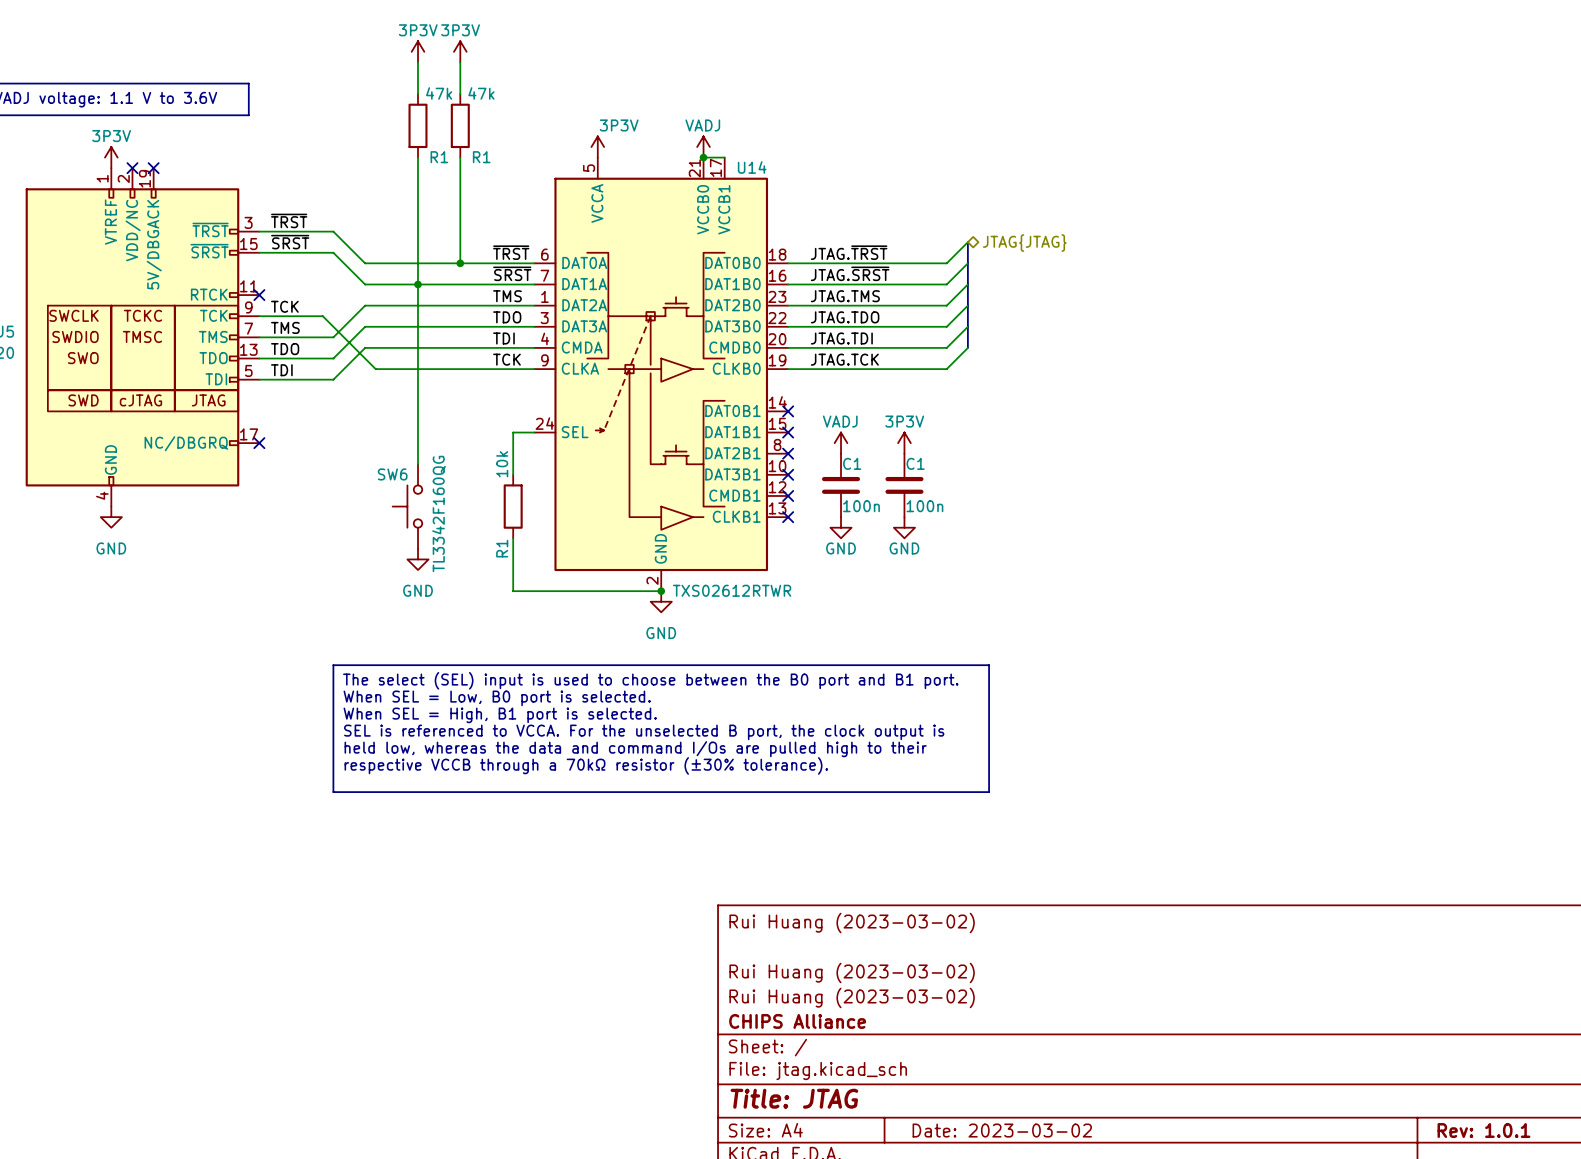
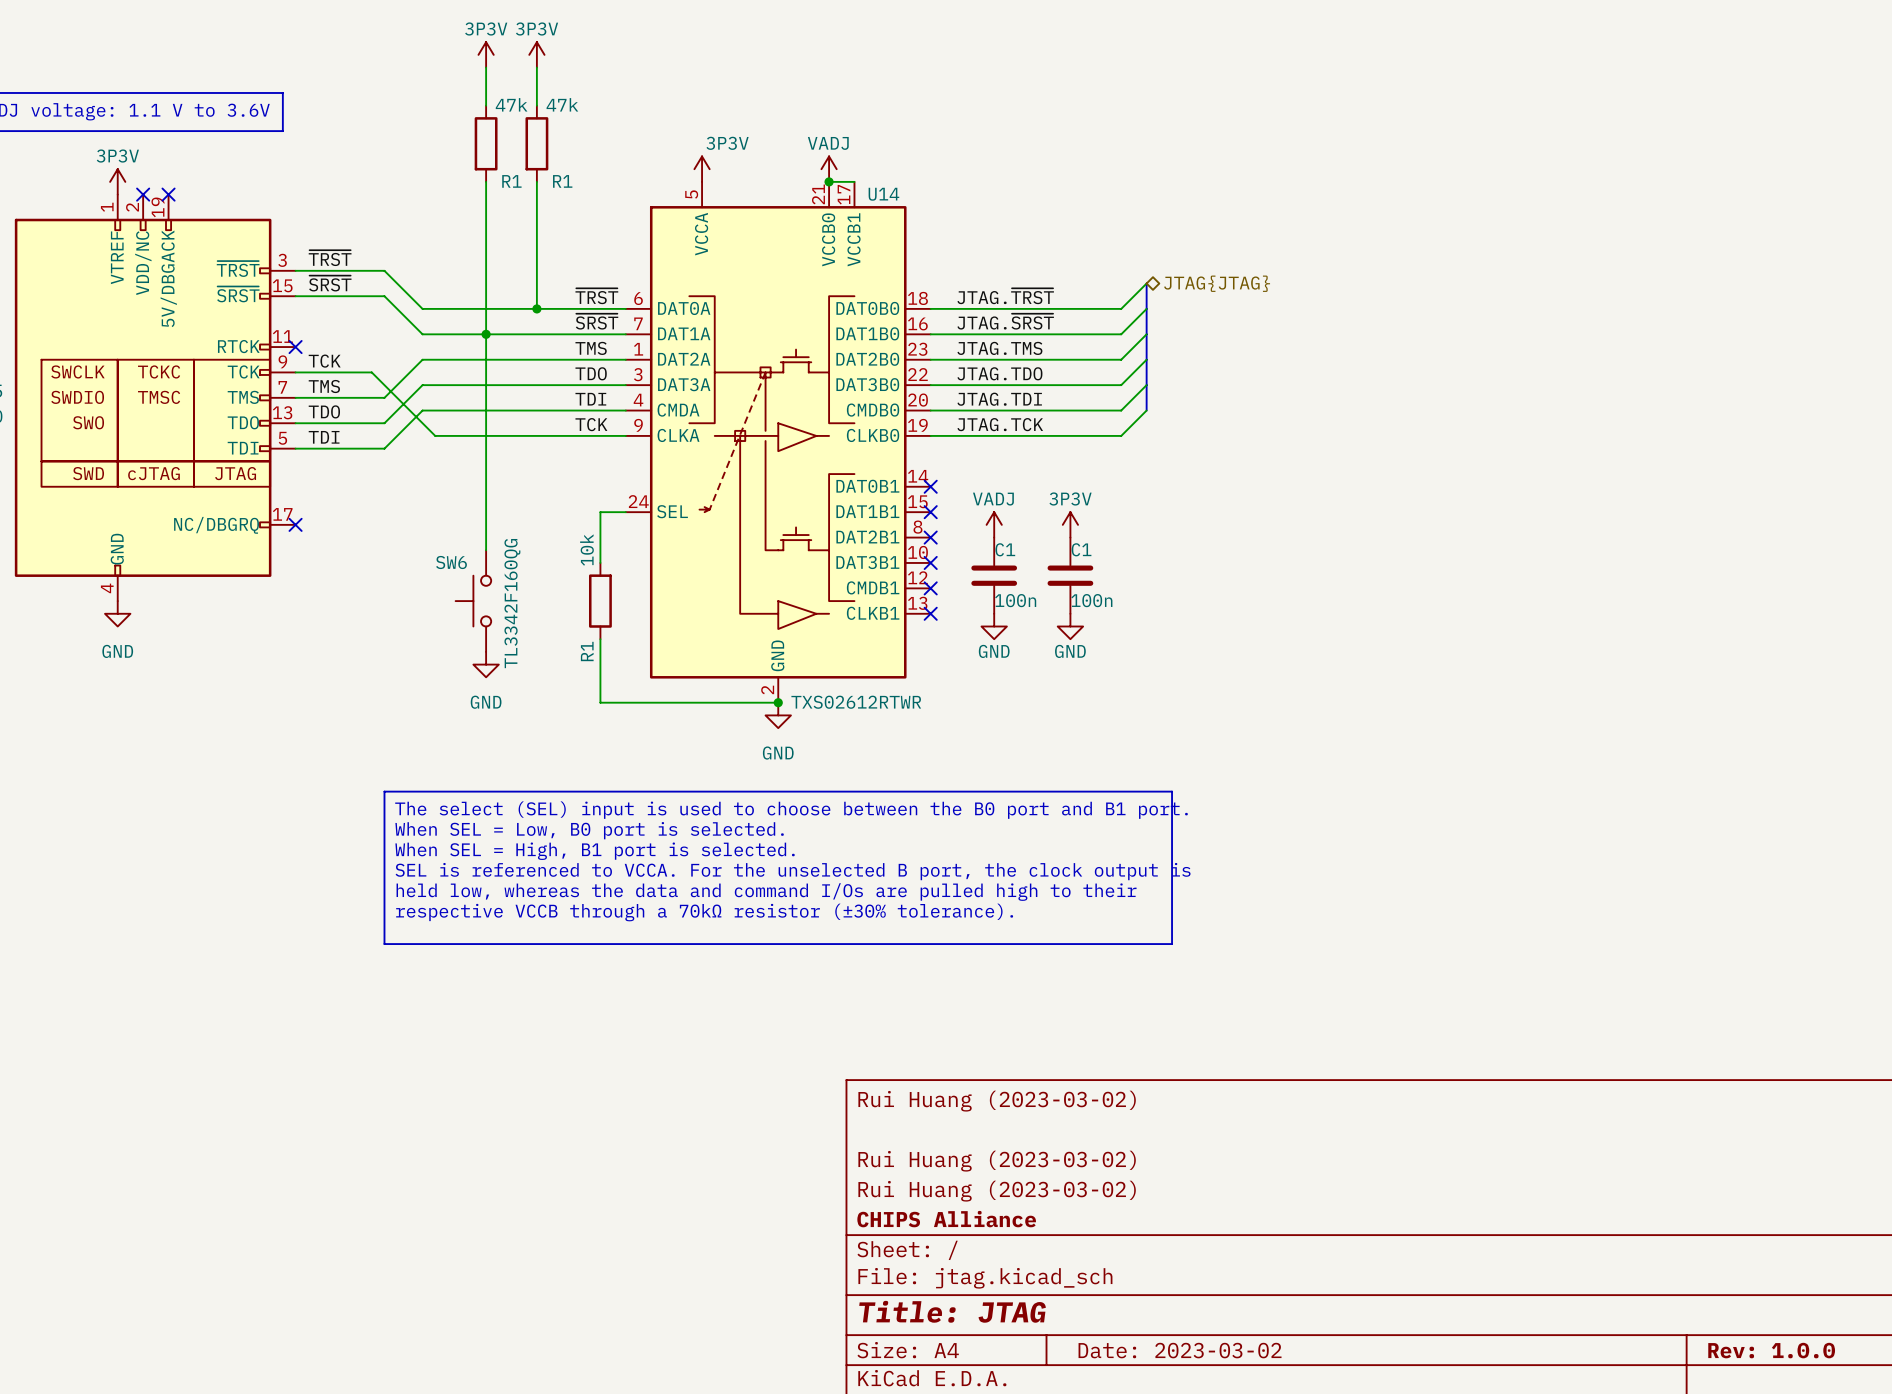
title block: Rev: 1.0.1 (1483, 1130) -> Rev: 1.0.0 (1771, 1350)

